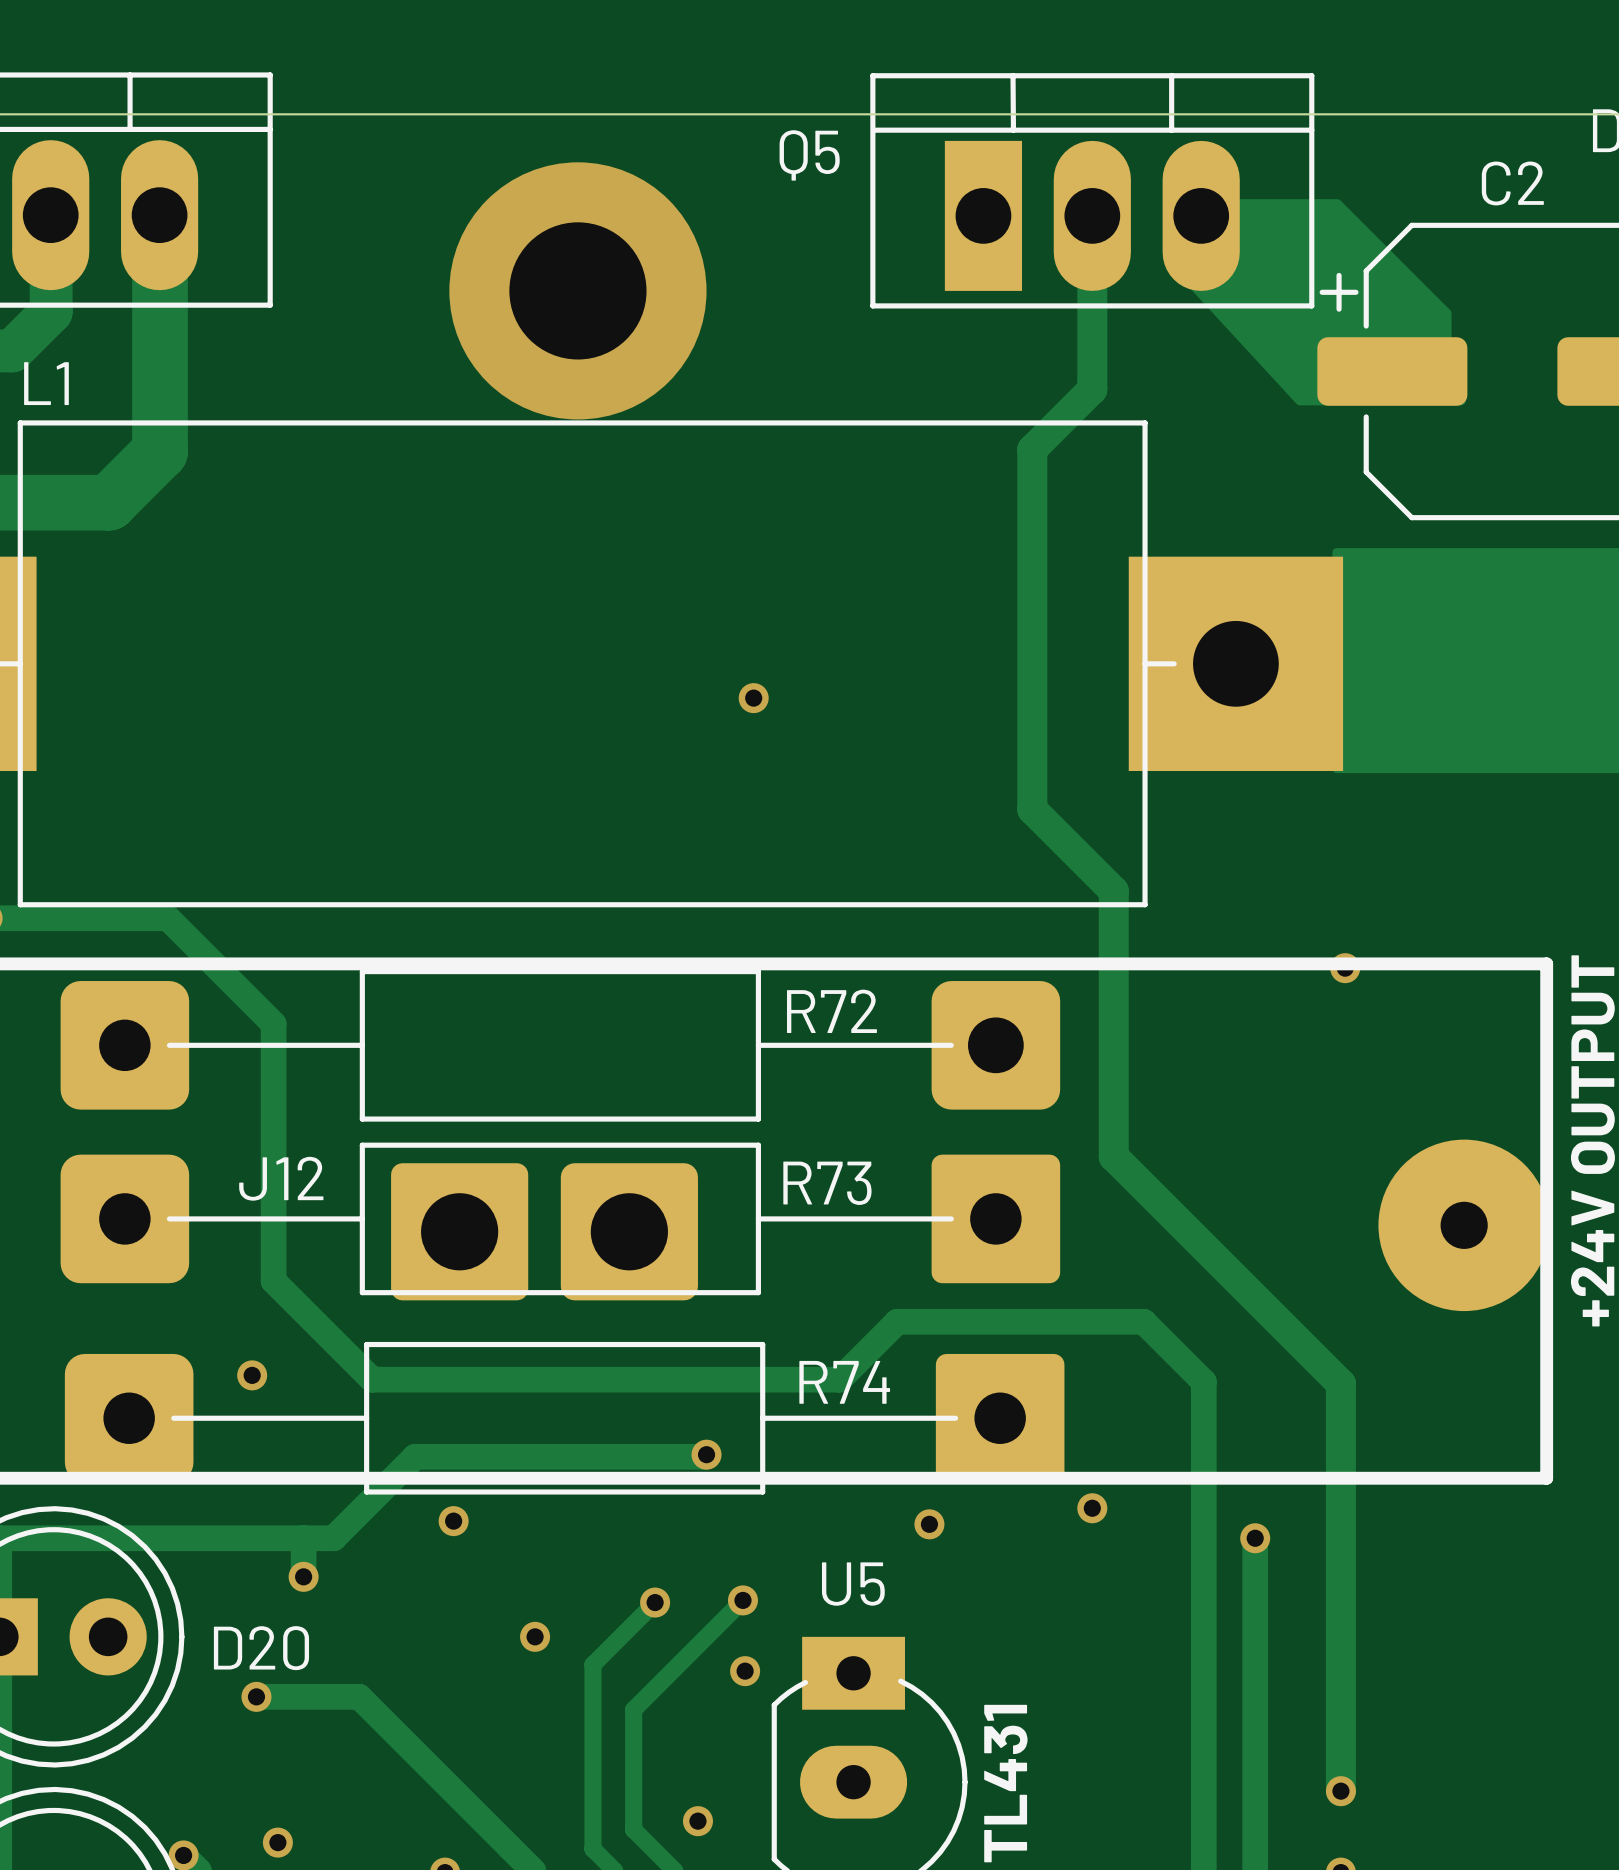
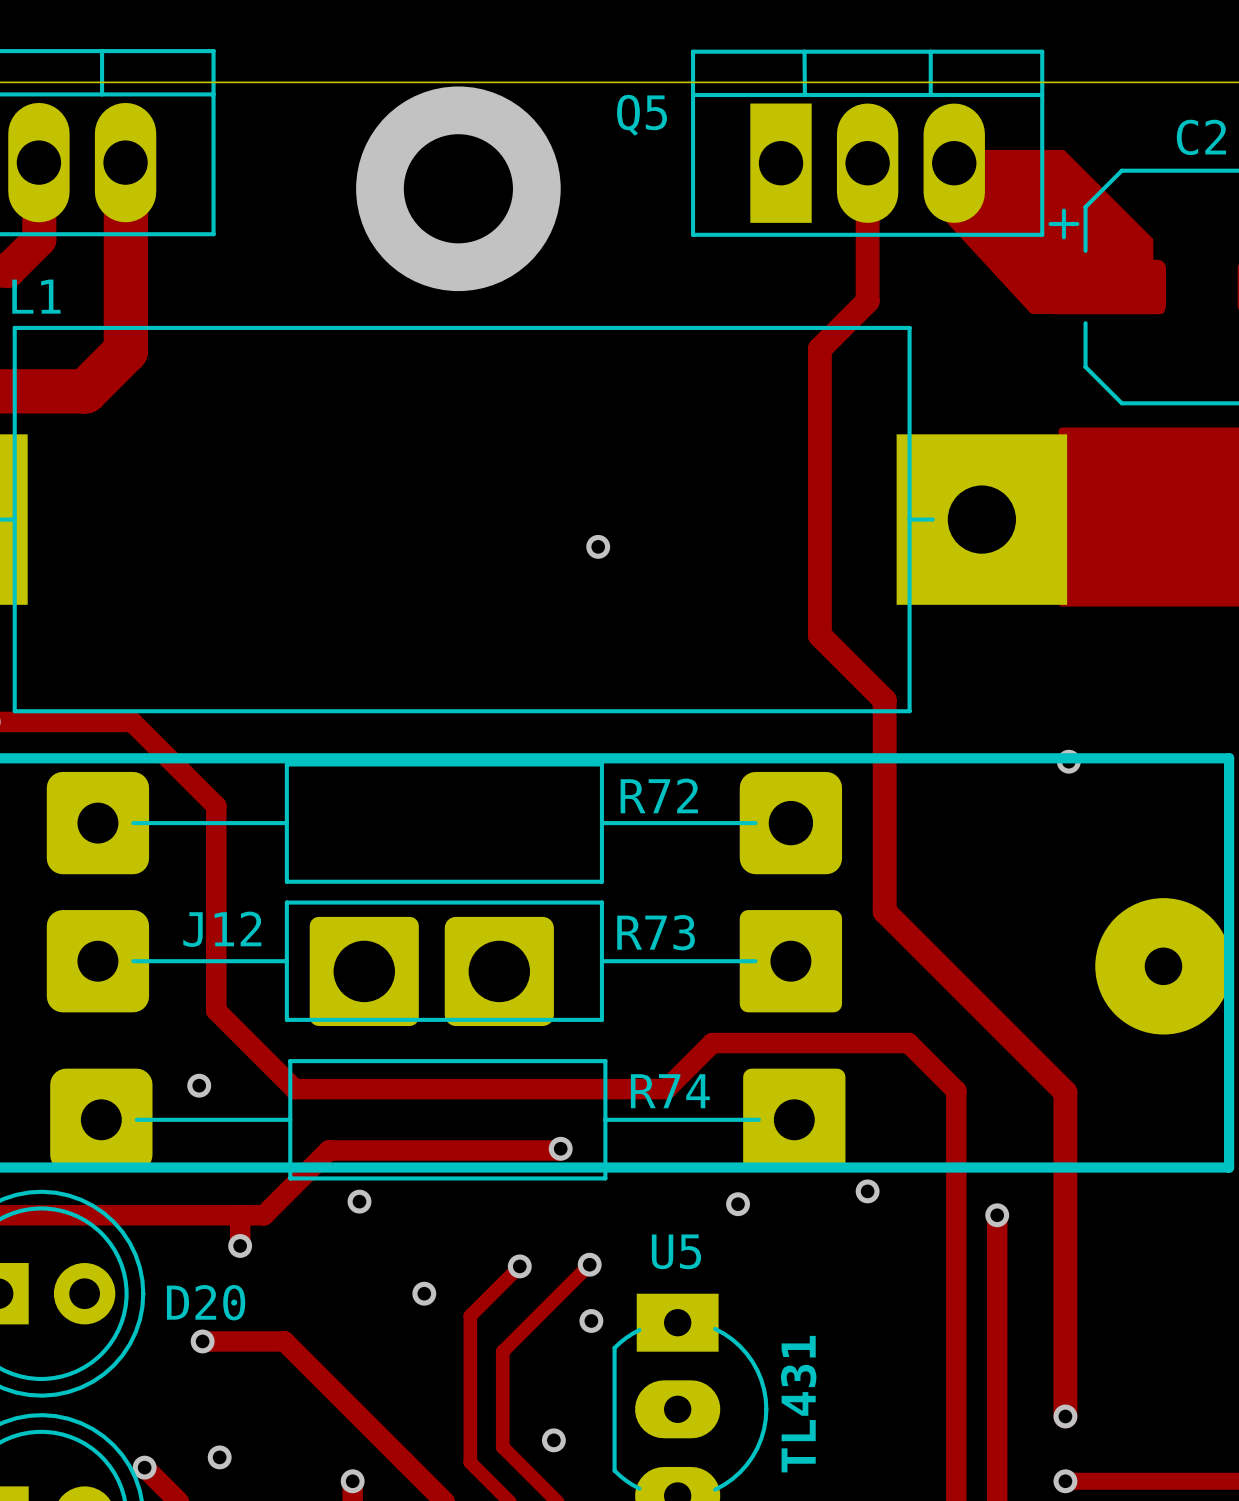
via position: (577, 290) -> (458, 188)

